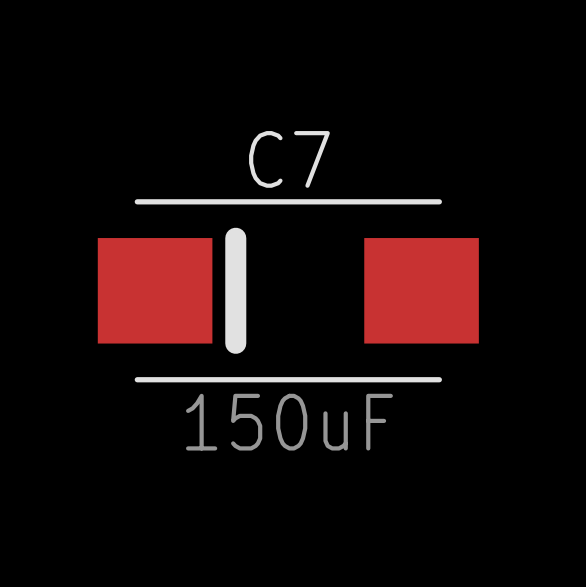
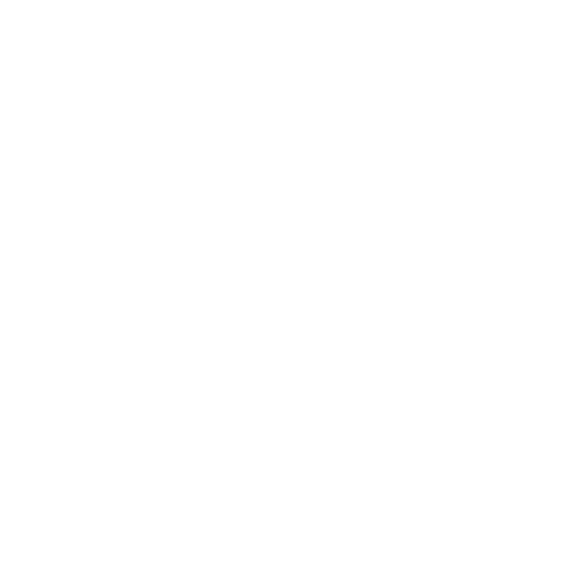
C7: 150uF (288, 290) -> none

